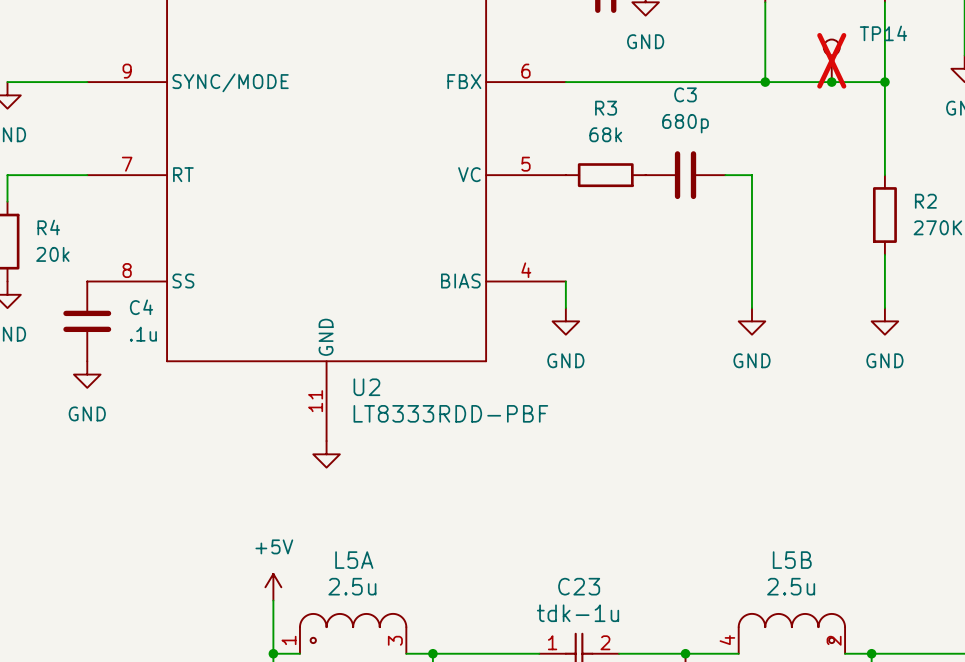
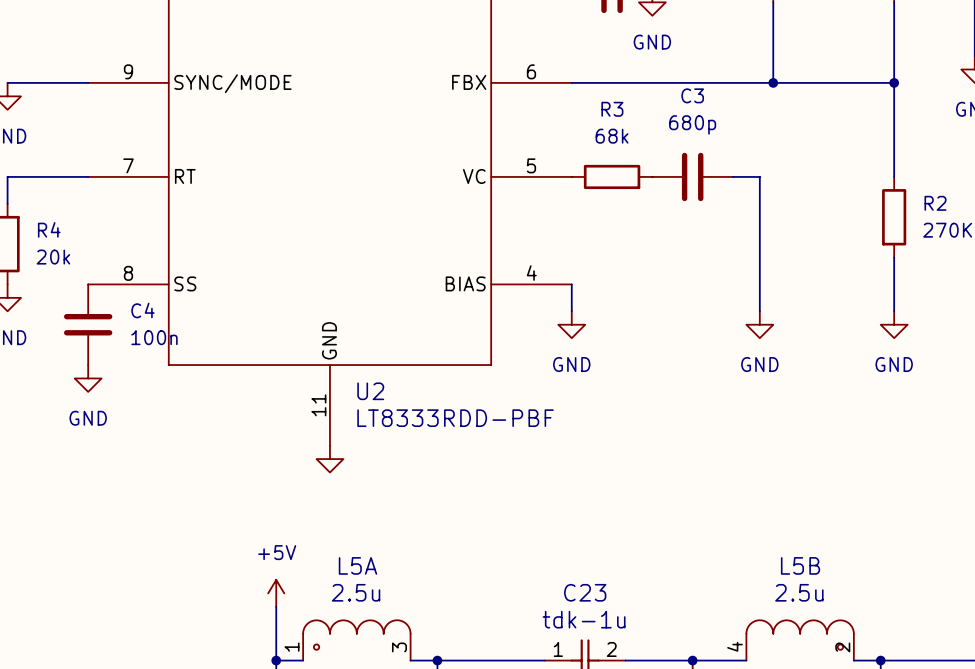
TP14: (831, 60) -> none
junction: (831, 82) -> none
C4 value: .1u (143, 334) -> 100n (154, 337)

